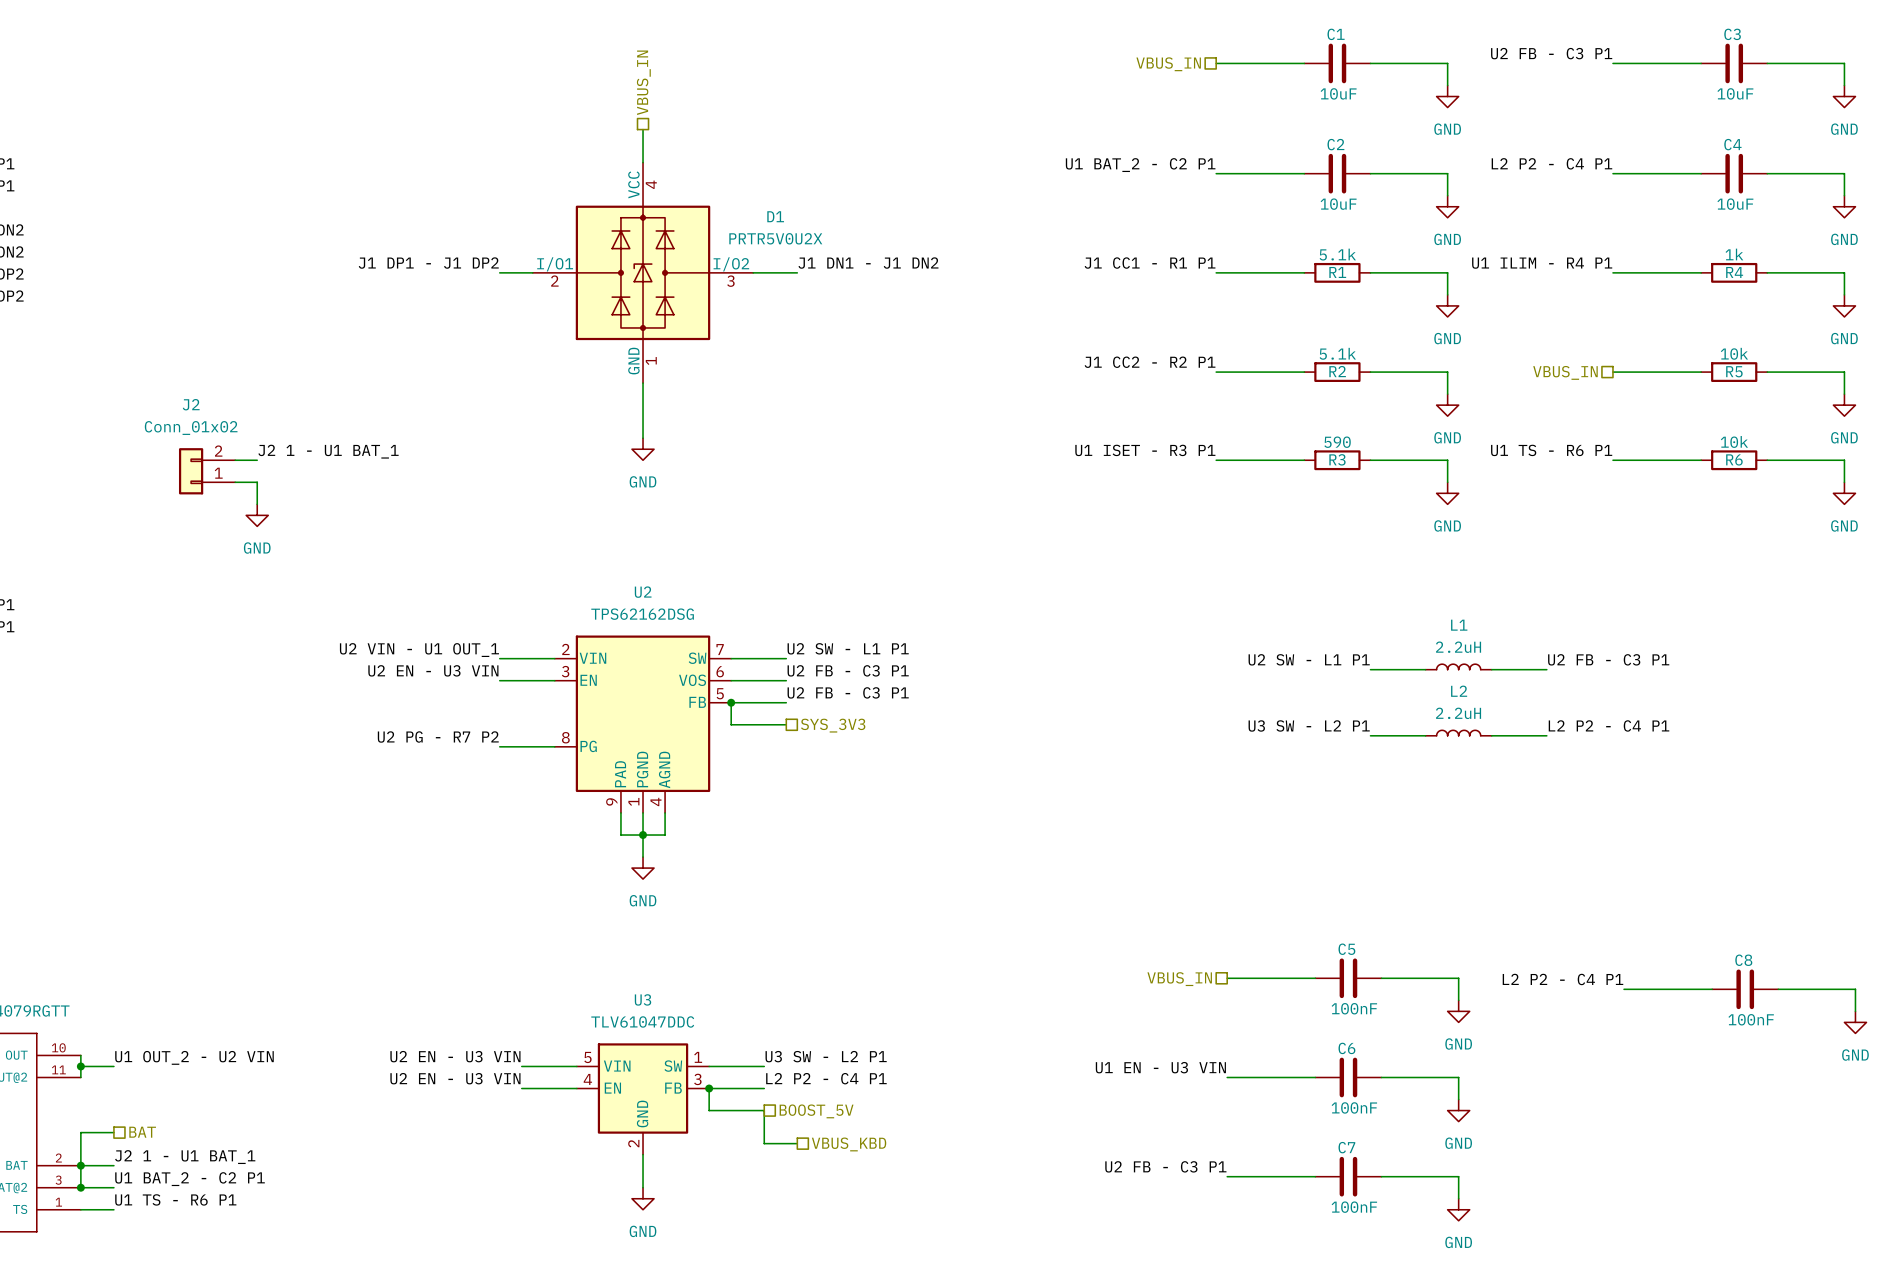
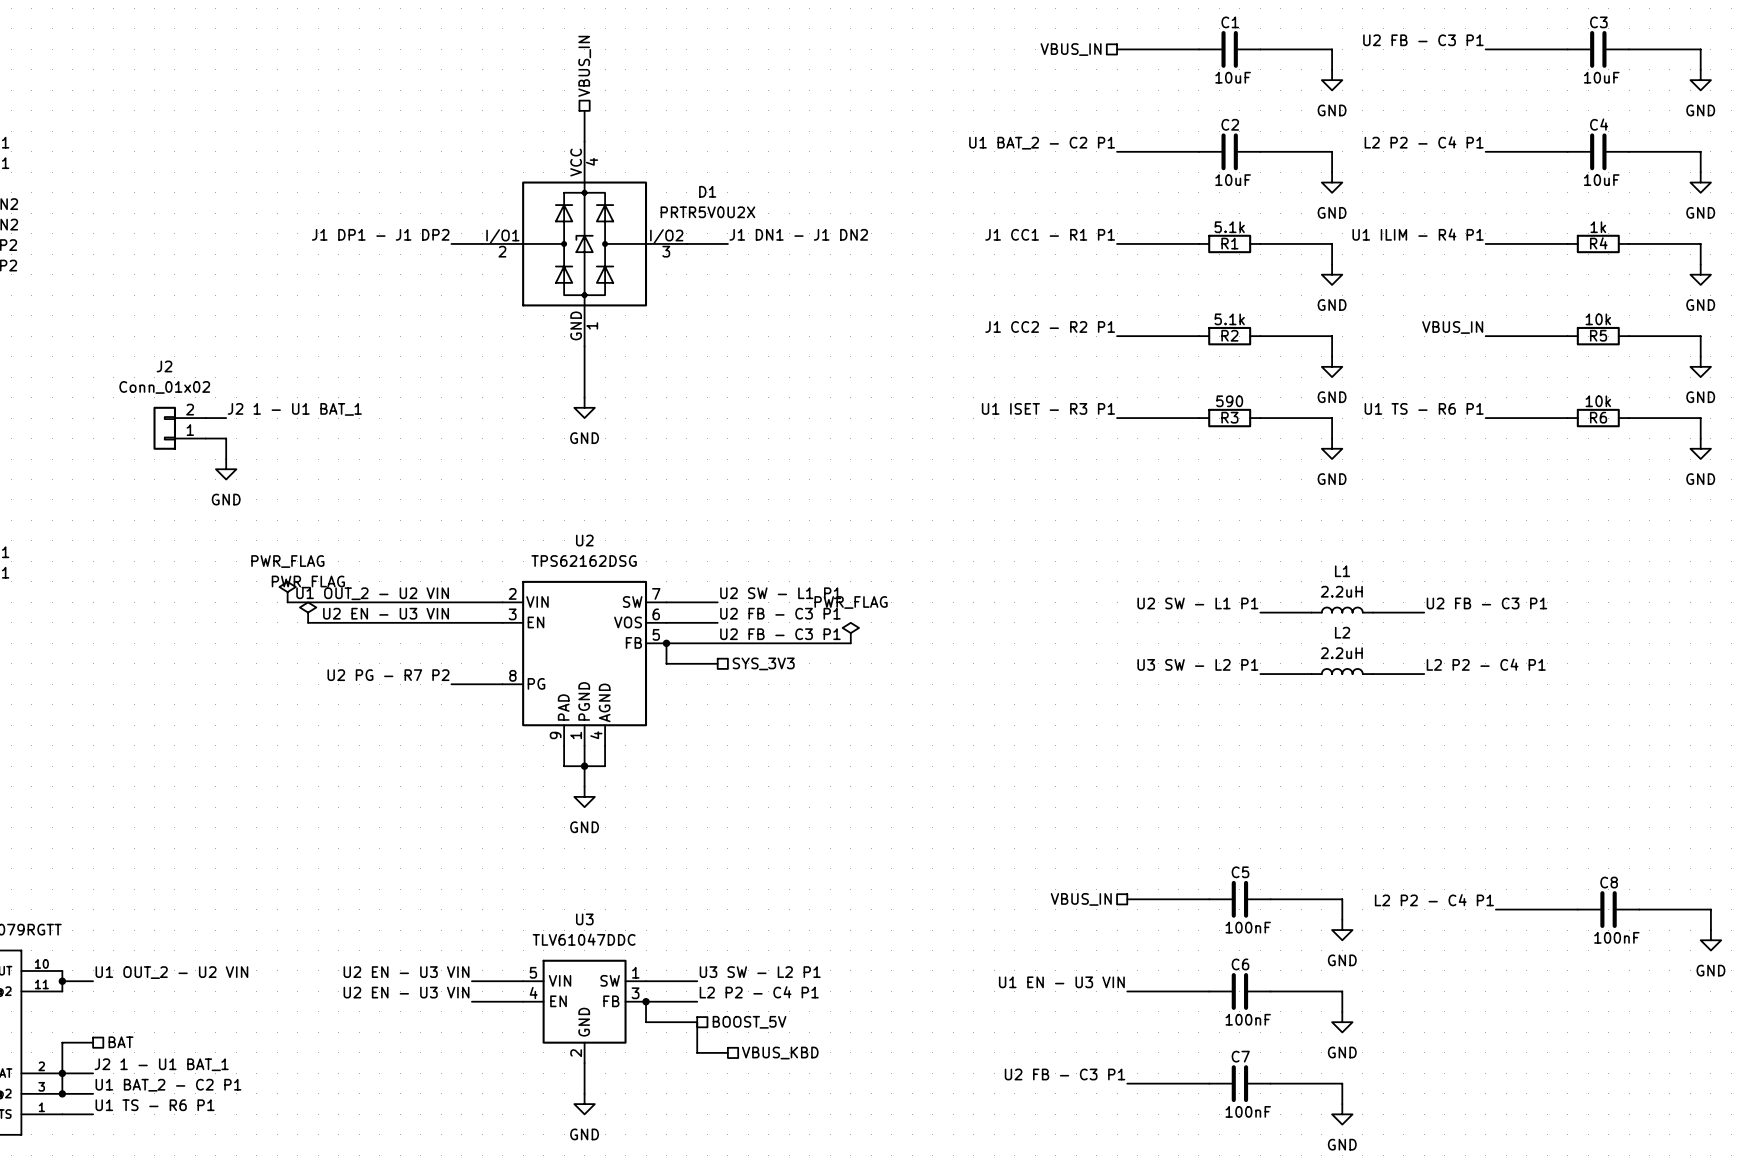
label: none -> VBUS_IN (1452, 327)
hierarchical label: VBUS_IN (1565, 372) -> none
power symbol: none -> PWR_FLAG (287, 592)
label: U2 VIN - U1 OUT_1 (419, 650) -> U1 OUT_2 - U2 VIN (372, 593)
wire: none -> (287, 602) (451, 602)
power symbol: none -> PWR_FLAG (308, 612)
wire: none -> (308, 622) (451, 622)
power symbol: none -> PWR_FLAG (850, 633)
wire: none -> (717, 643) (850, 643)

